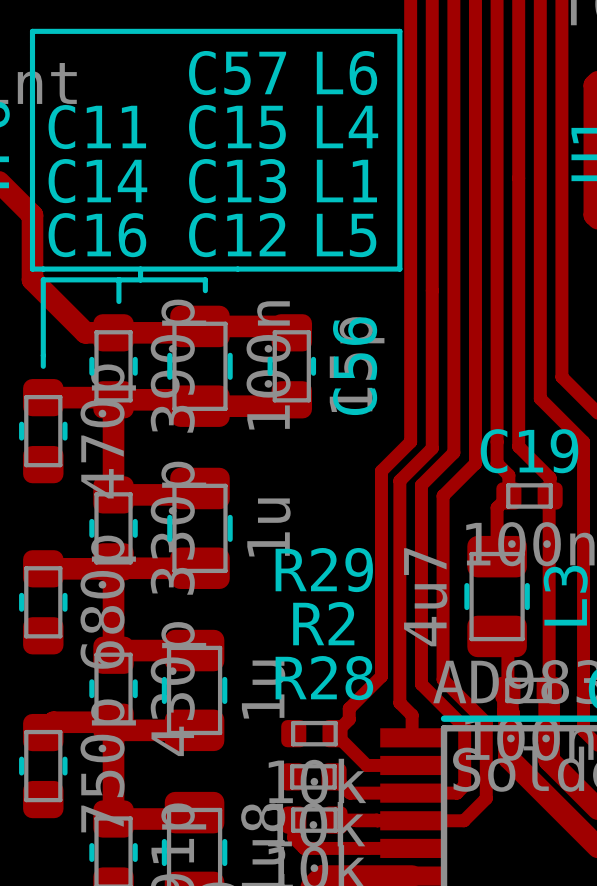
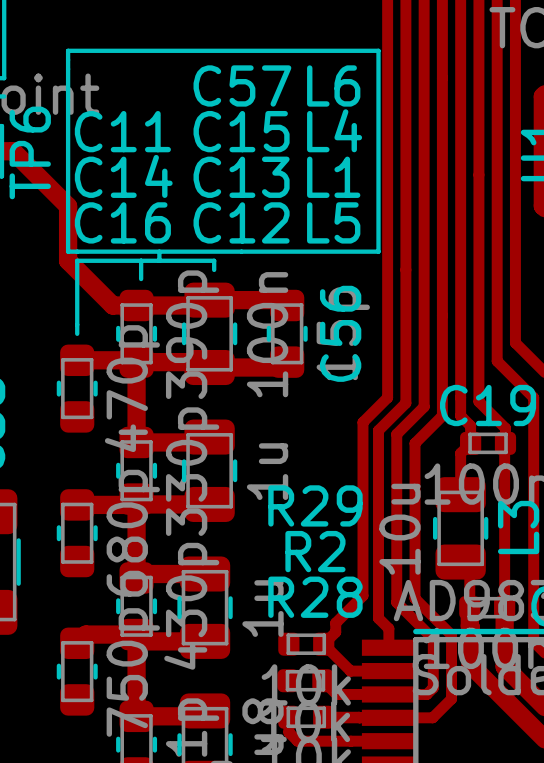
L3 value: 4u7 (425, 597) -> 10u (400, 529)

